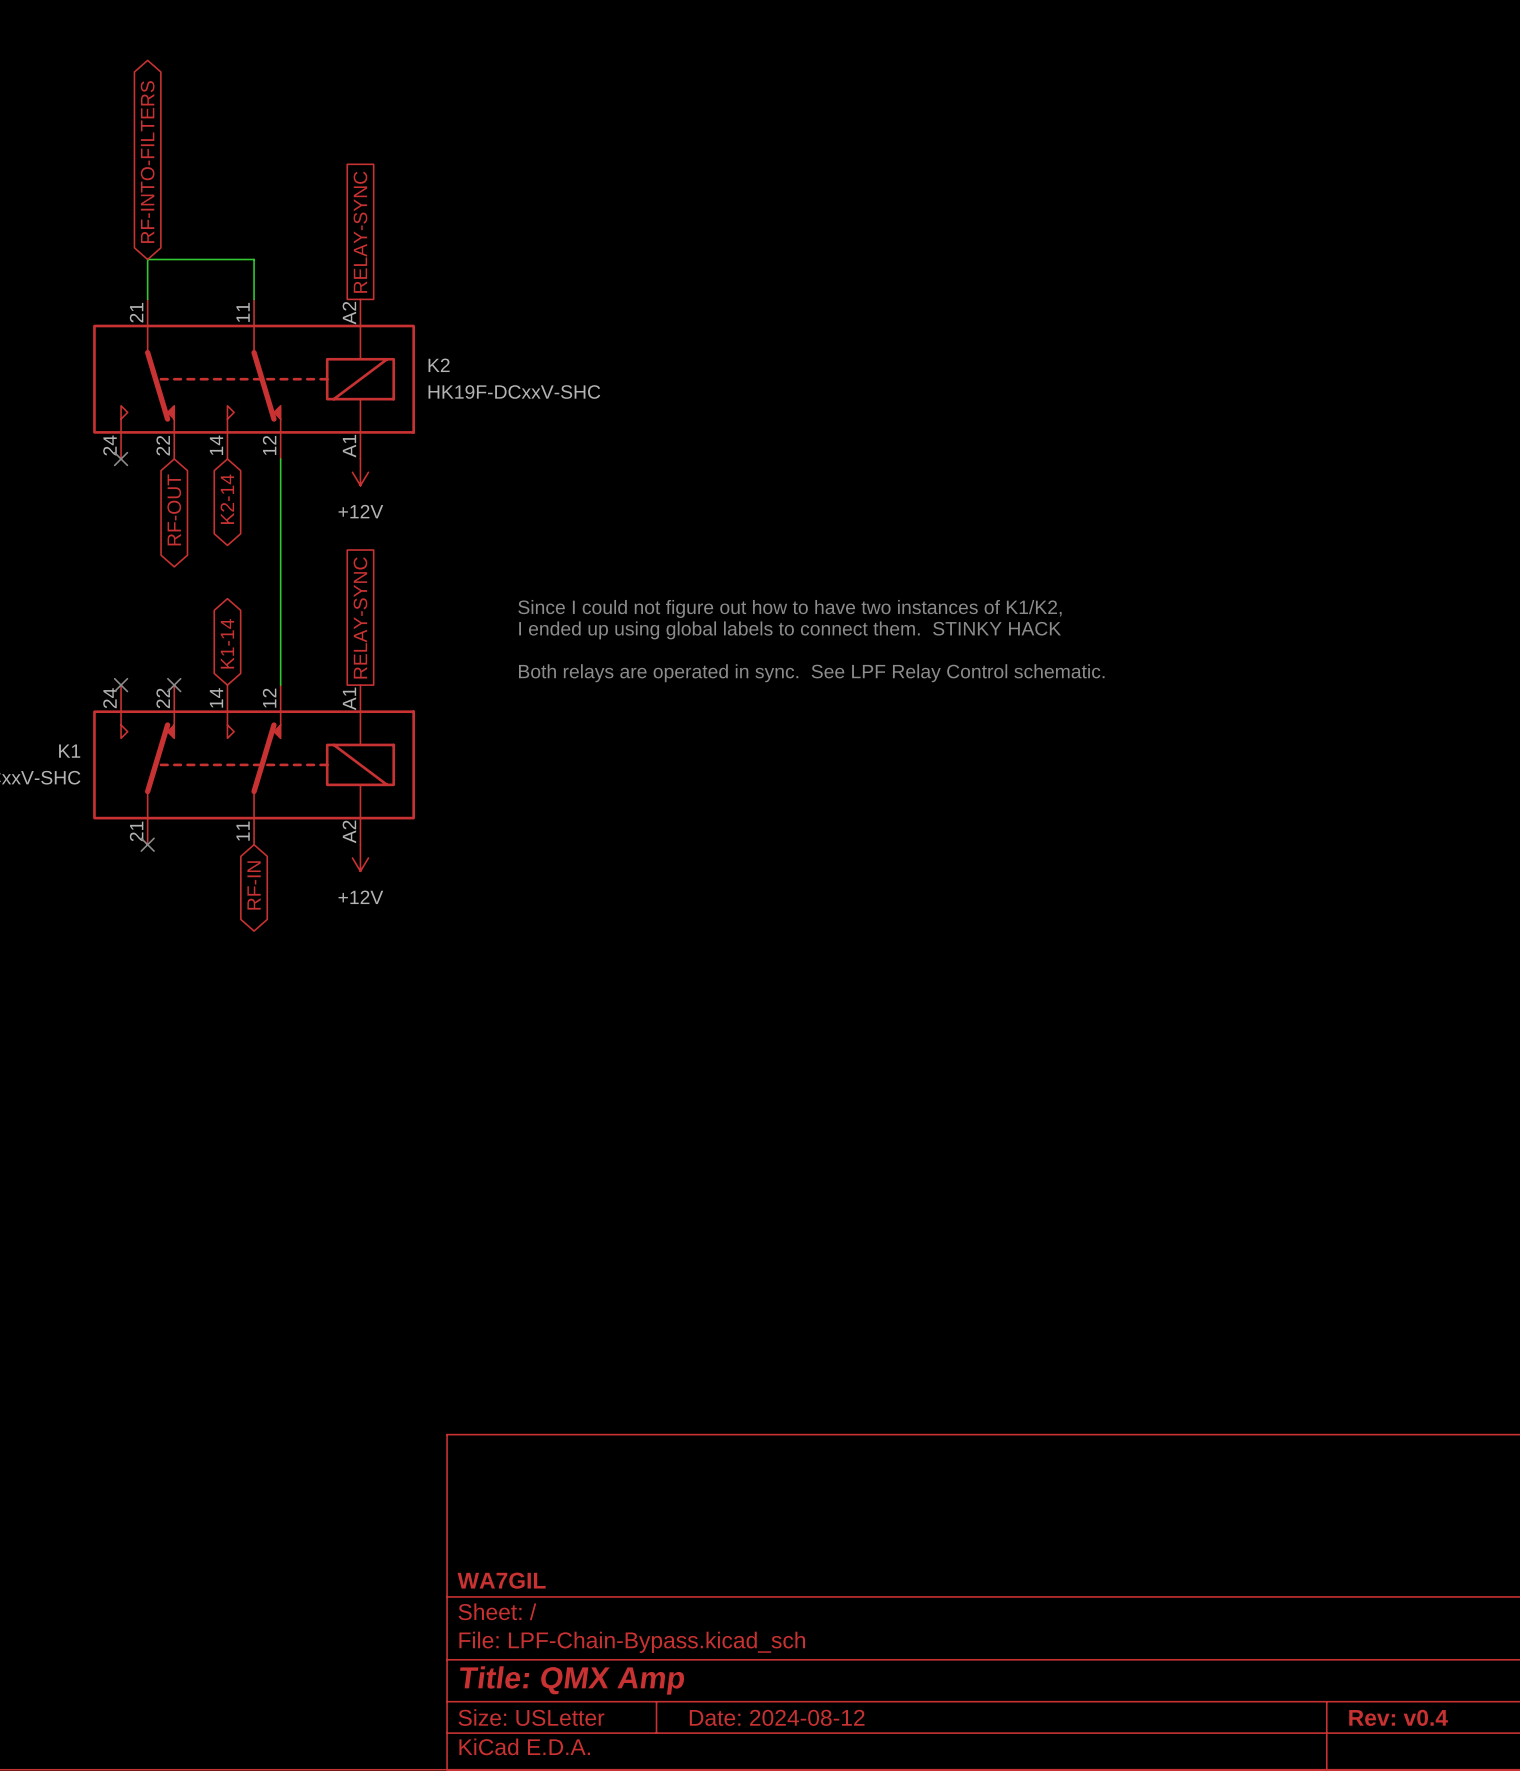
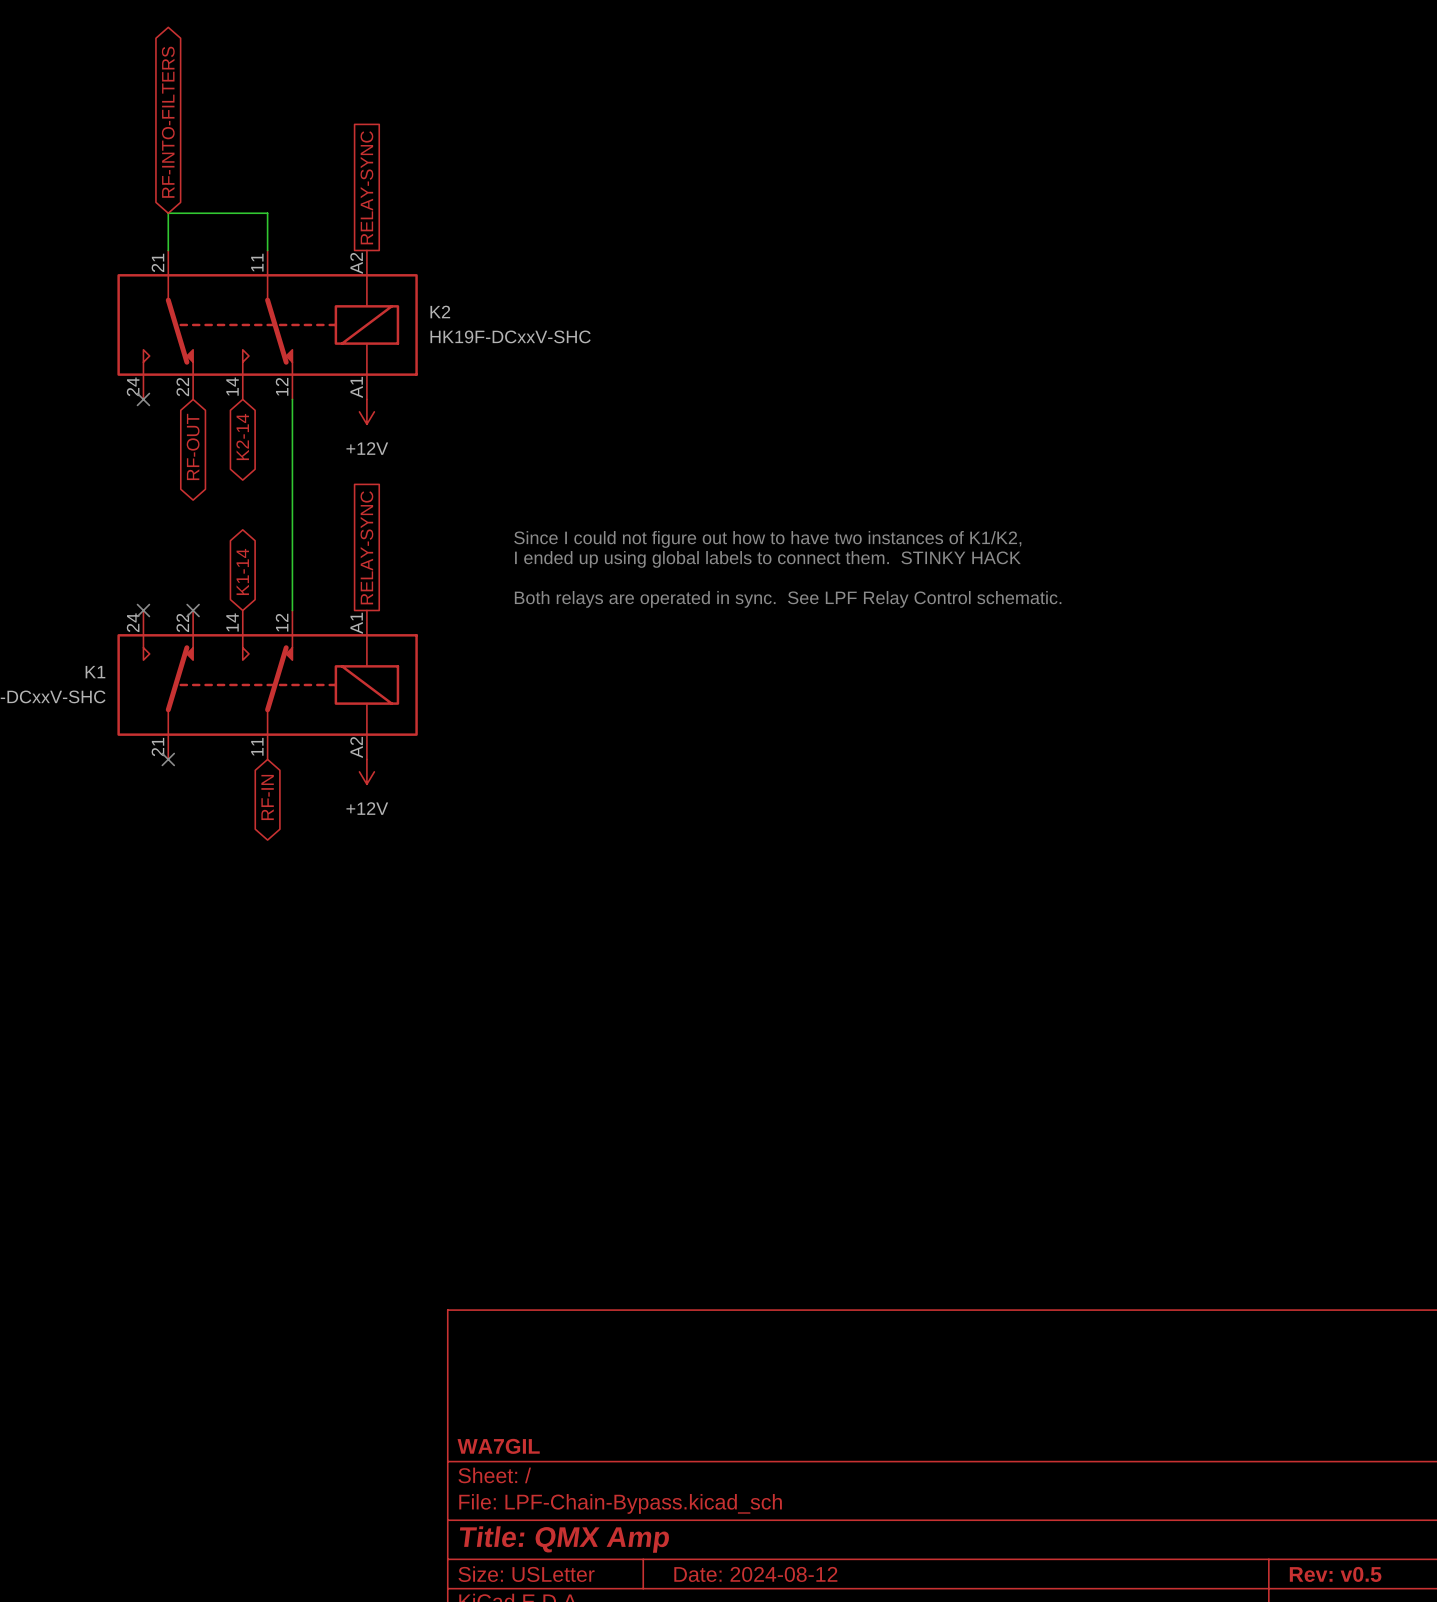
title block: Rev: v0.4 (1398, 1717) -> Rev: v0.5 (1335, 1574)

